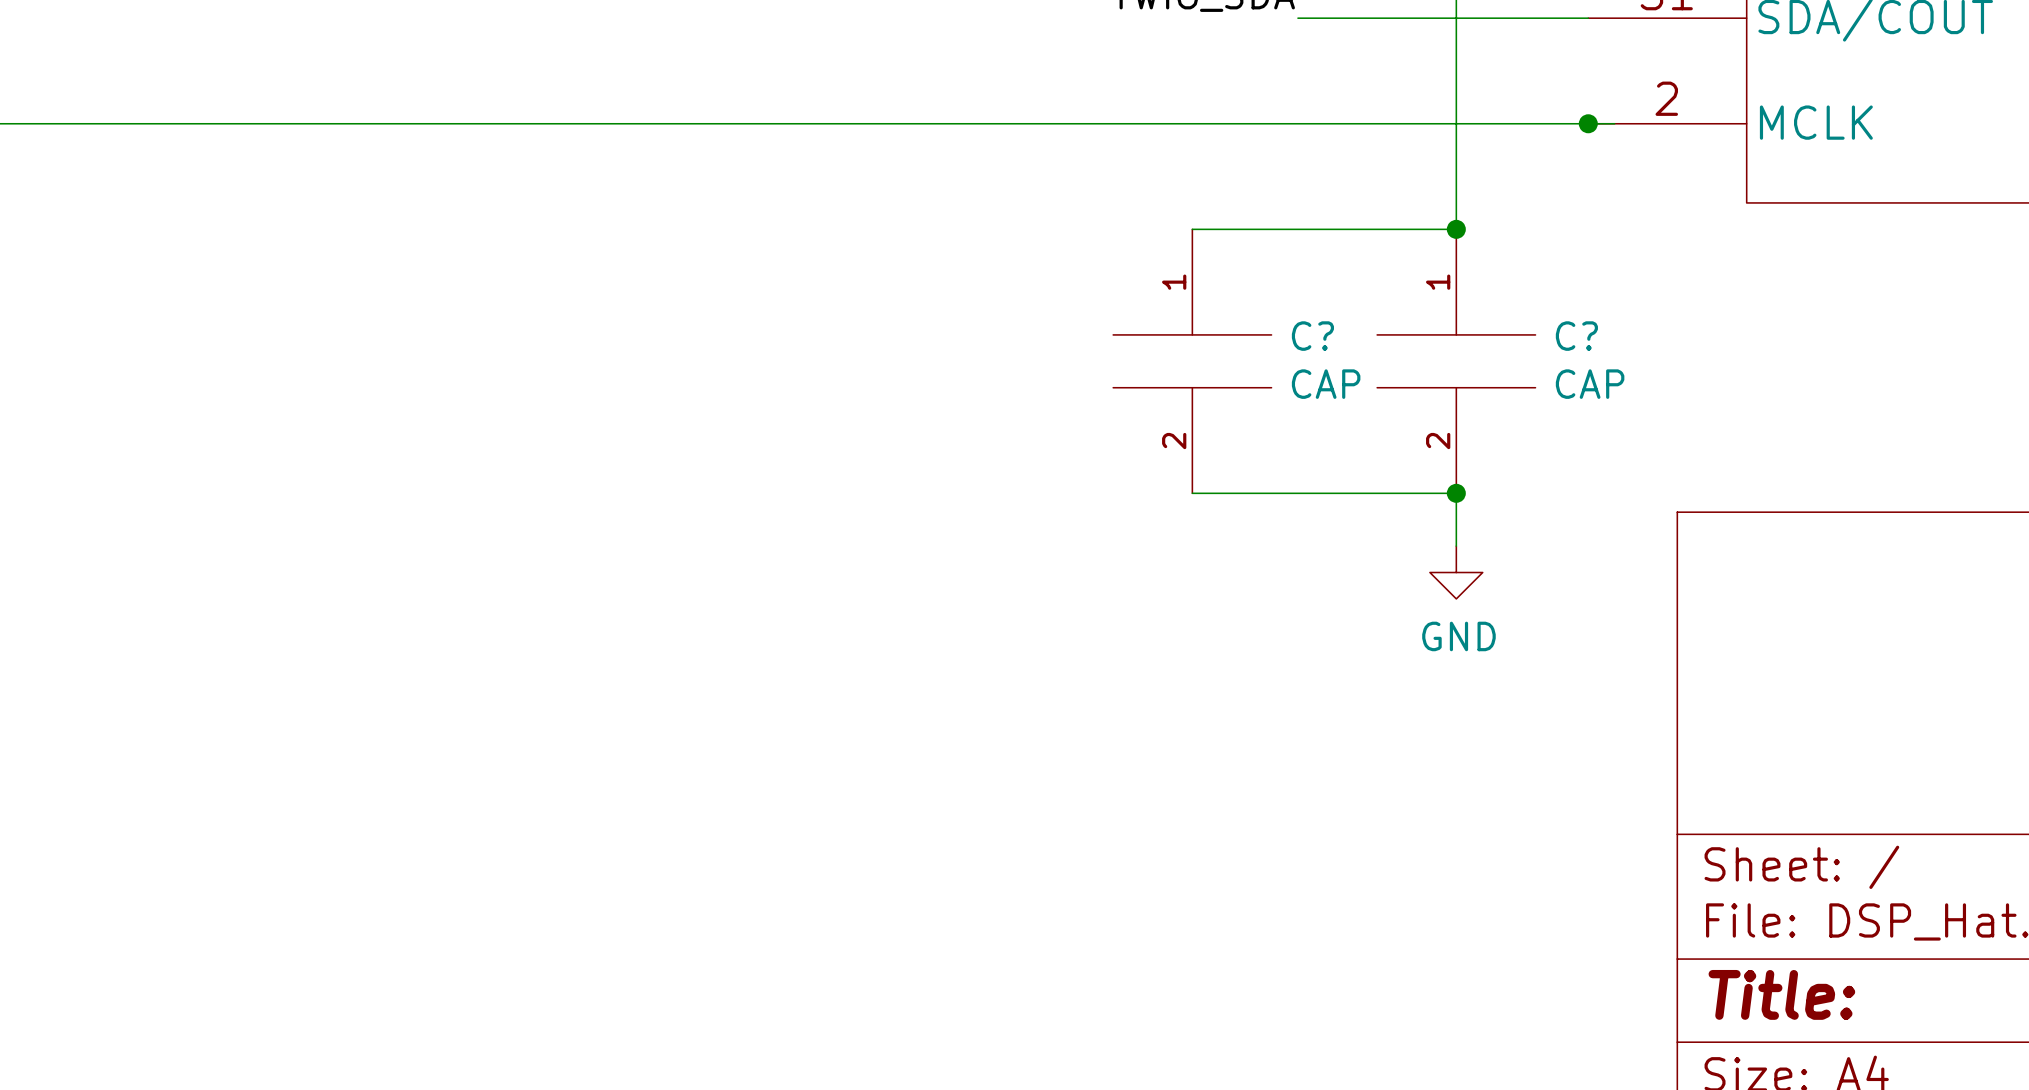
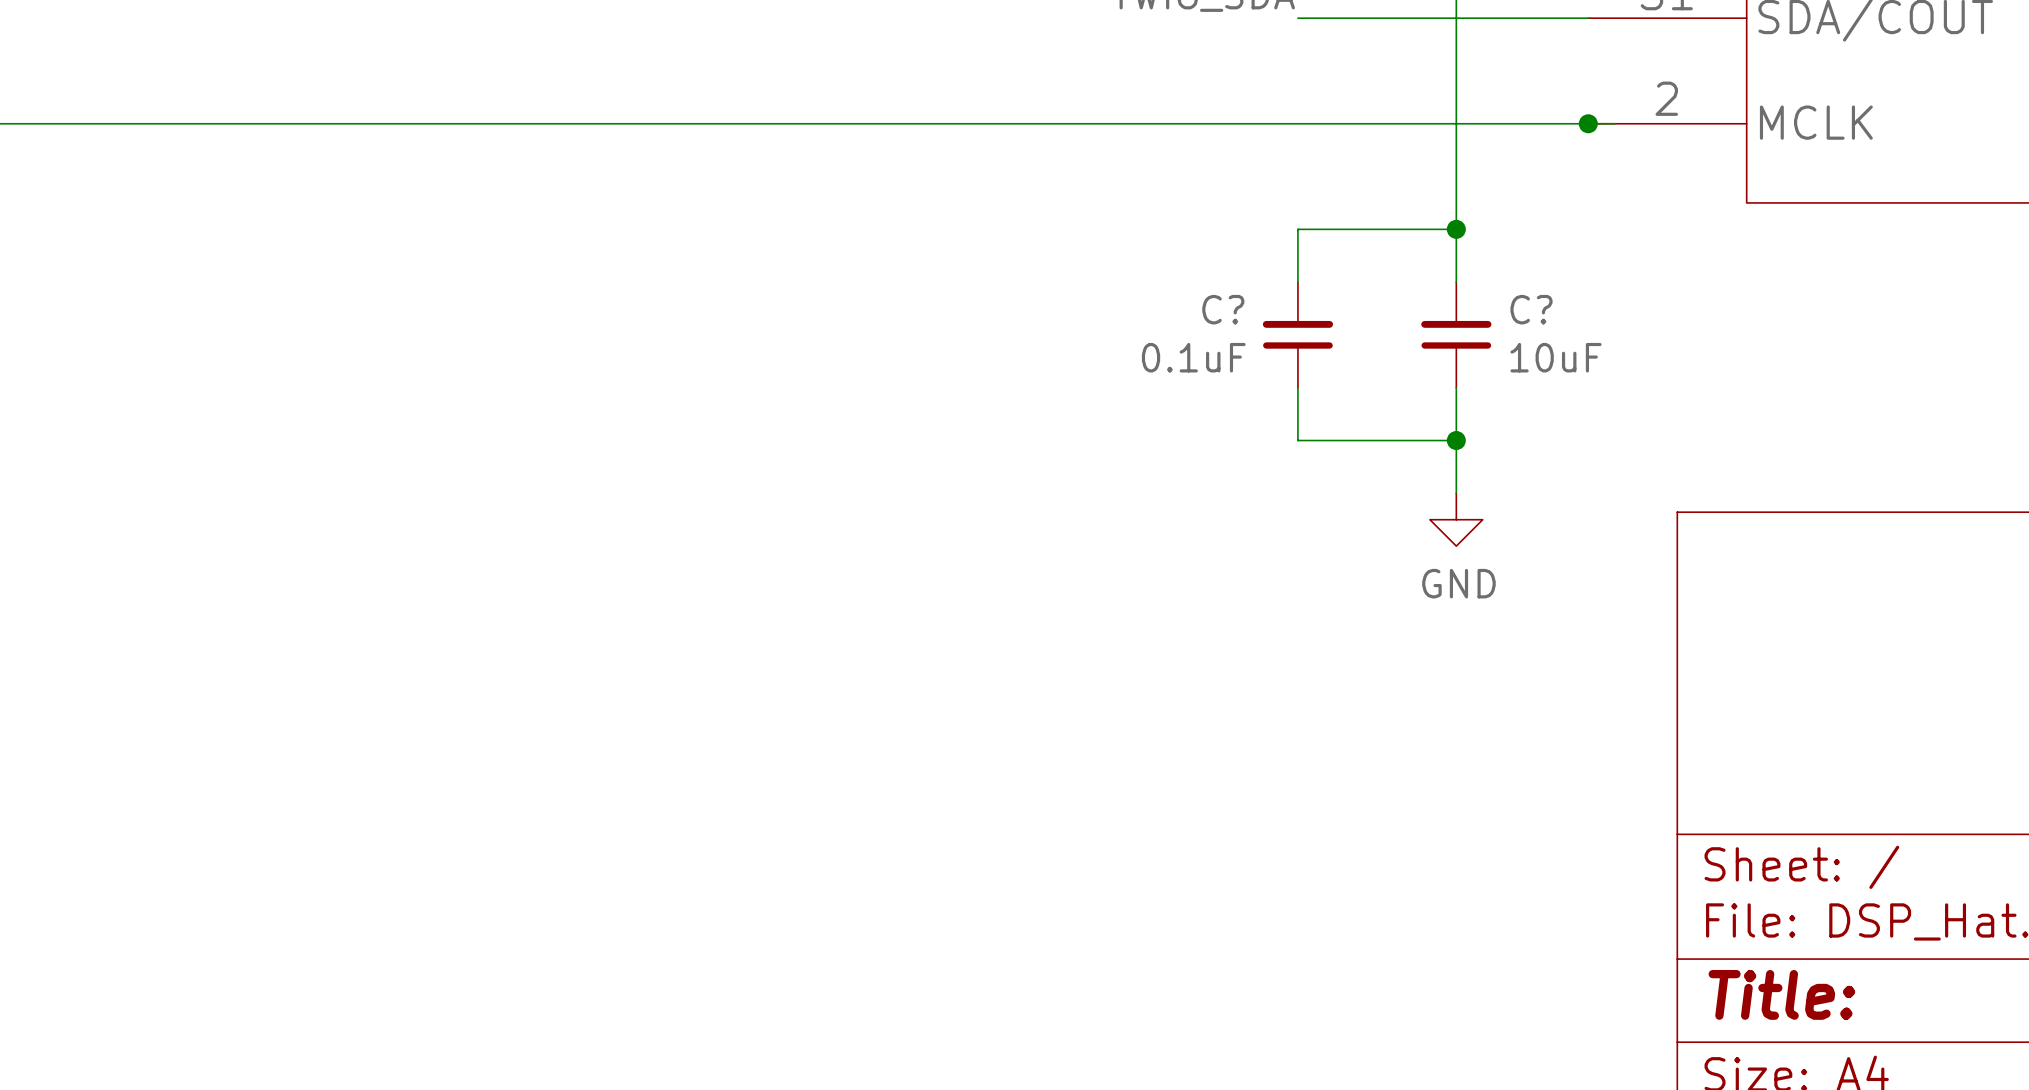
wire: (1192, 229) (1297, 229) -> (1297, 282) (1297, 229)
C?: none -> 0.1uF (1297, 334)
C?: none -> 10uF (1456, 334)
C?: CAP (1192, 361) -> none
C?: CAP (1456, 361) -> none
wire: none -> (1297, 387) (1297, 440) (1456, 440)
wire: (1192, 493) (1456, 493) (1456, 546) -> none
junction position: (1456, 493) -> (1456, 440)
power symbol position: GND (1456, 572) -> GND (1456, 519)

